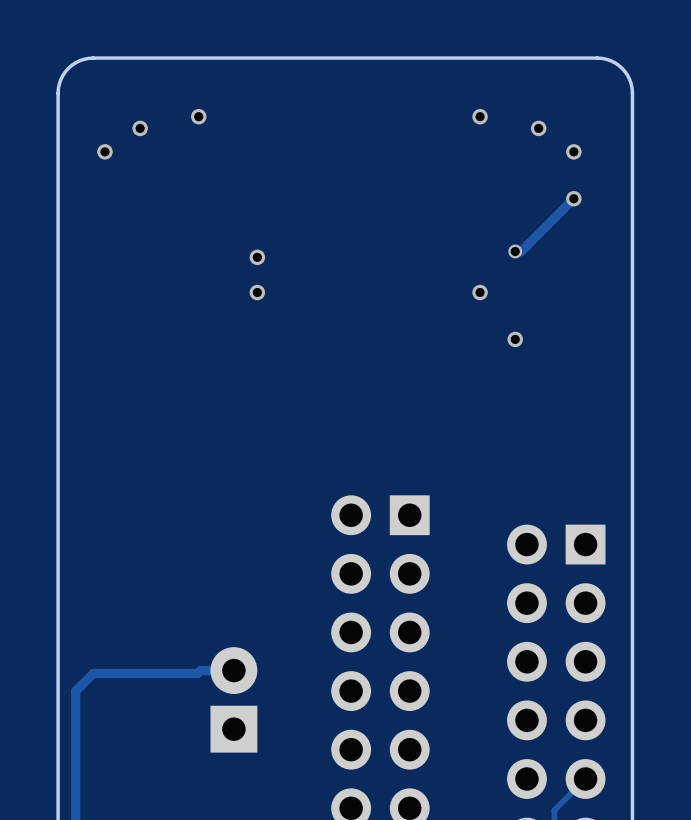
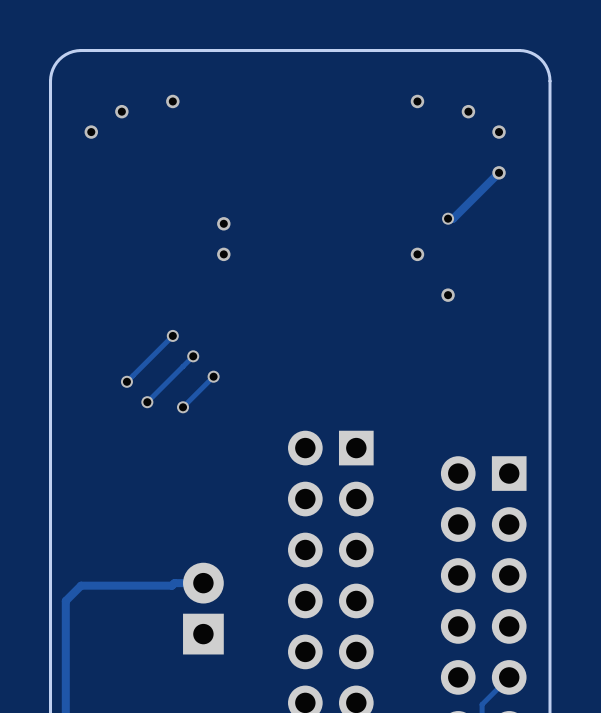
track: none -> (172, 335) (126, 381)
via: none -> (172, 335)
track: none -> (193, 356) (147, 402)
via: none -> (193, 356)
track: none -> (213, 376) (183, 407)
via: none -> (213, 376)
via: none -> (126, 381)
via: none -> (147, 402)
via: none -> (183, 407)

